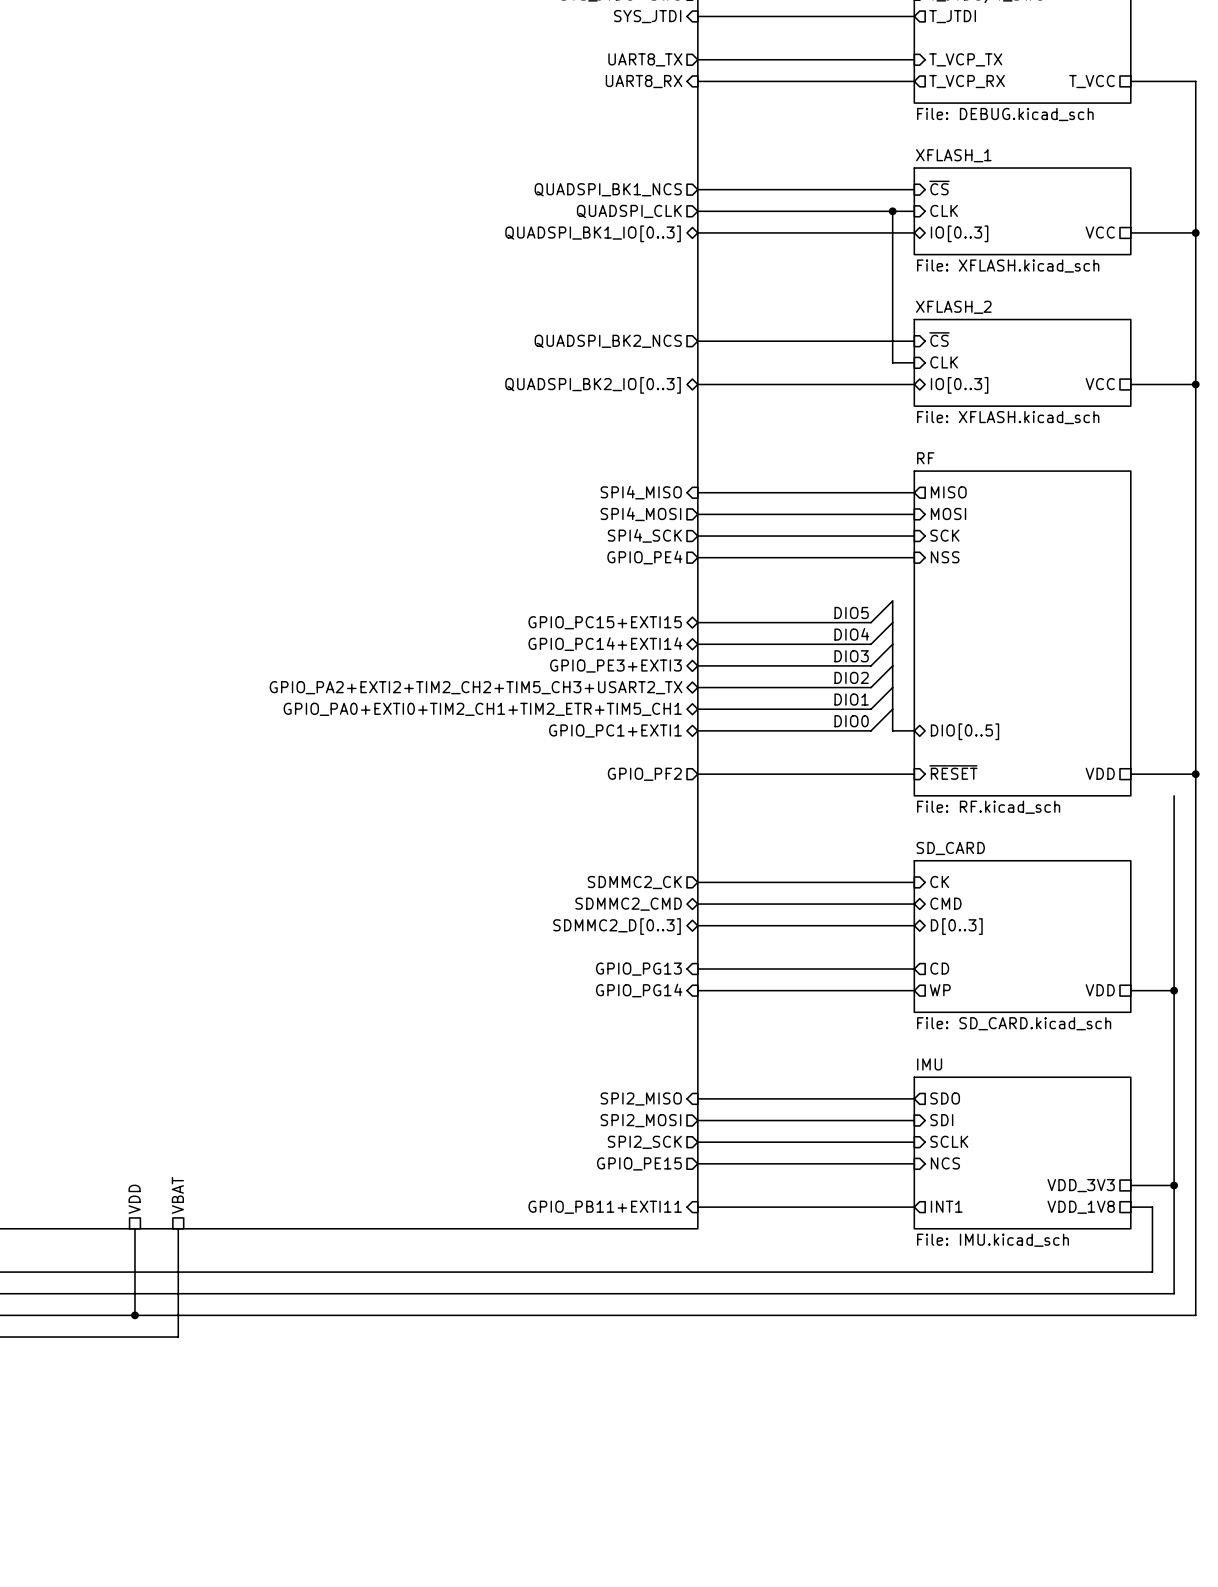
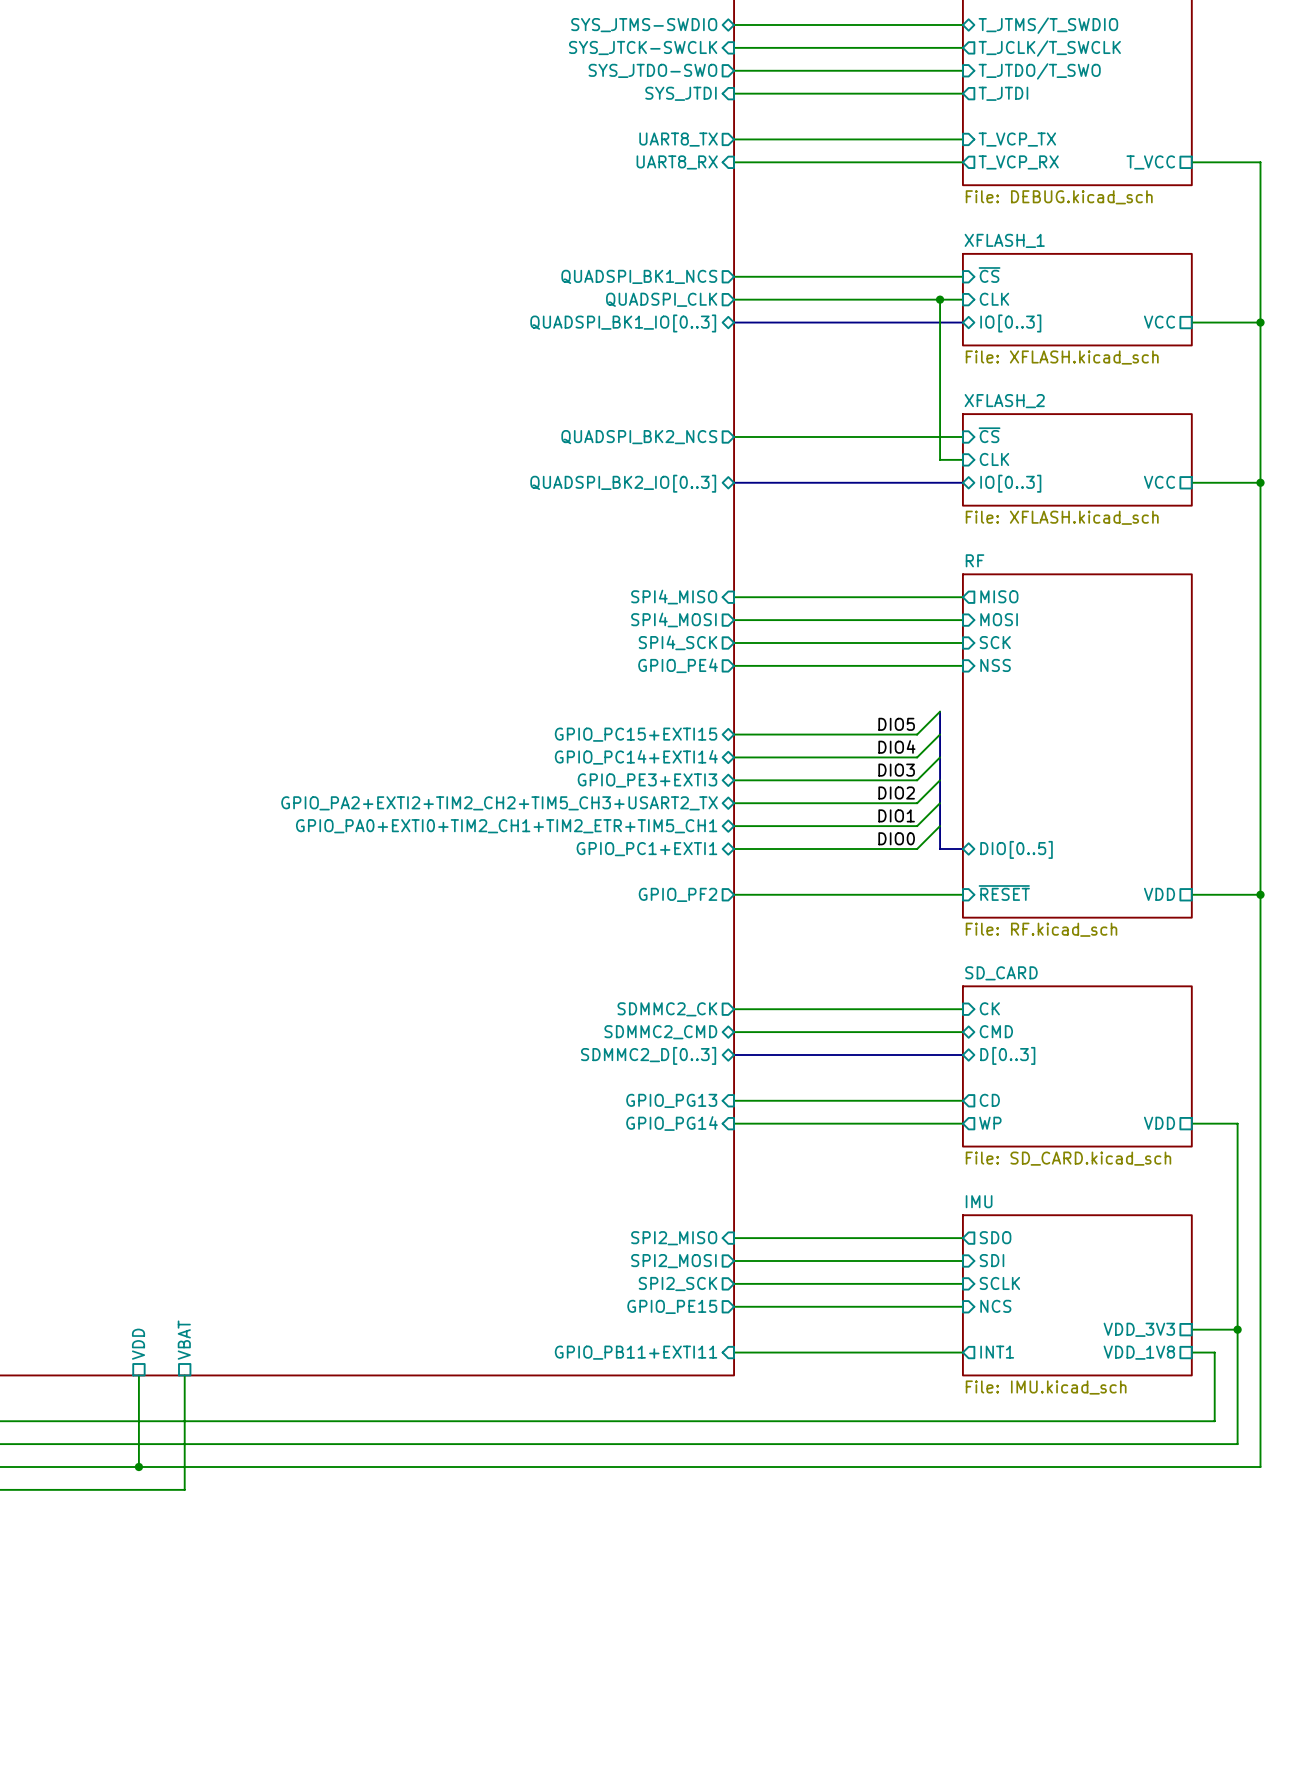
wire: (1174, 795) (1174, 990) -> none
junction: (1174, 990) -> none

